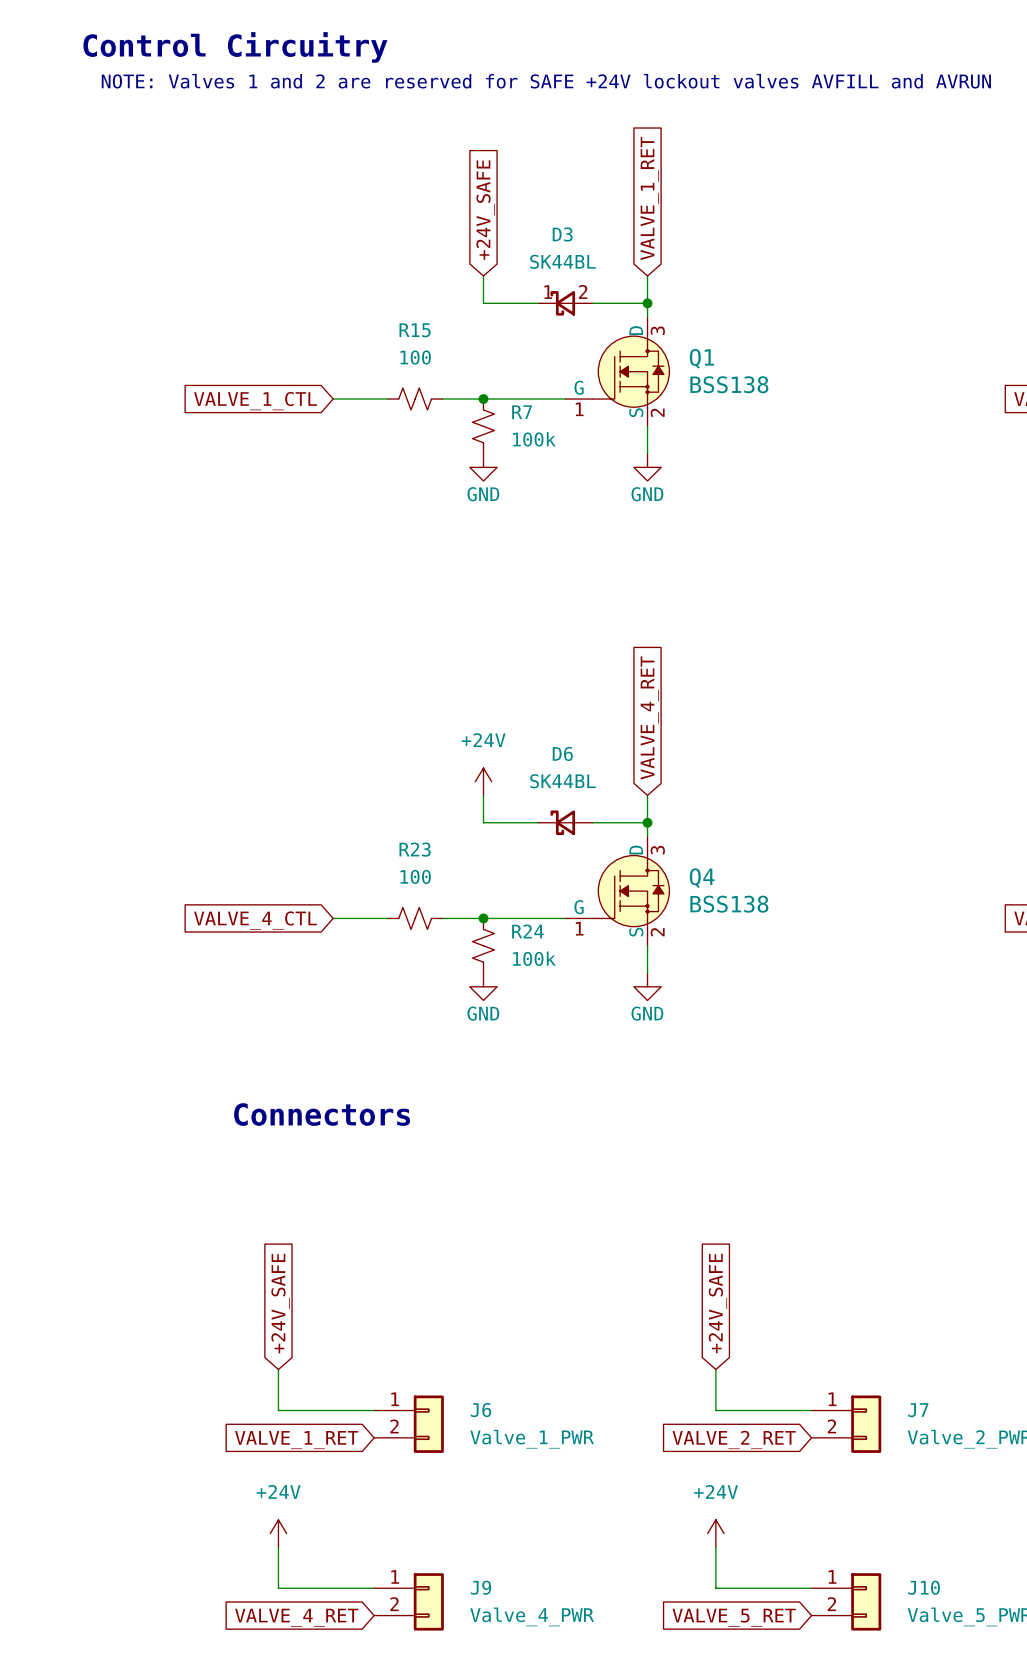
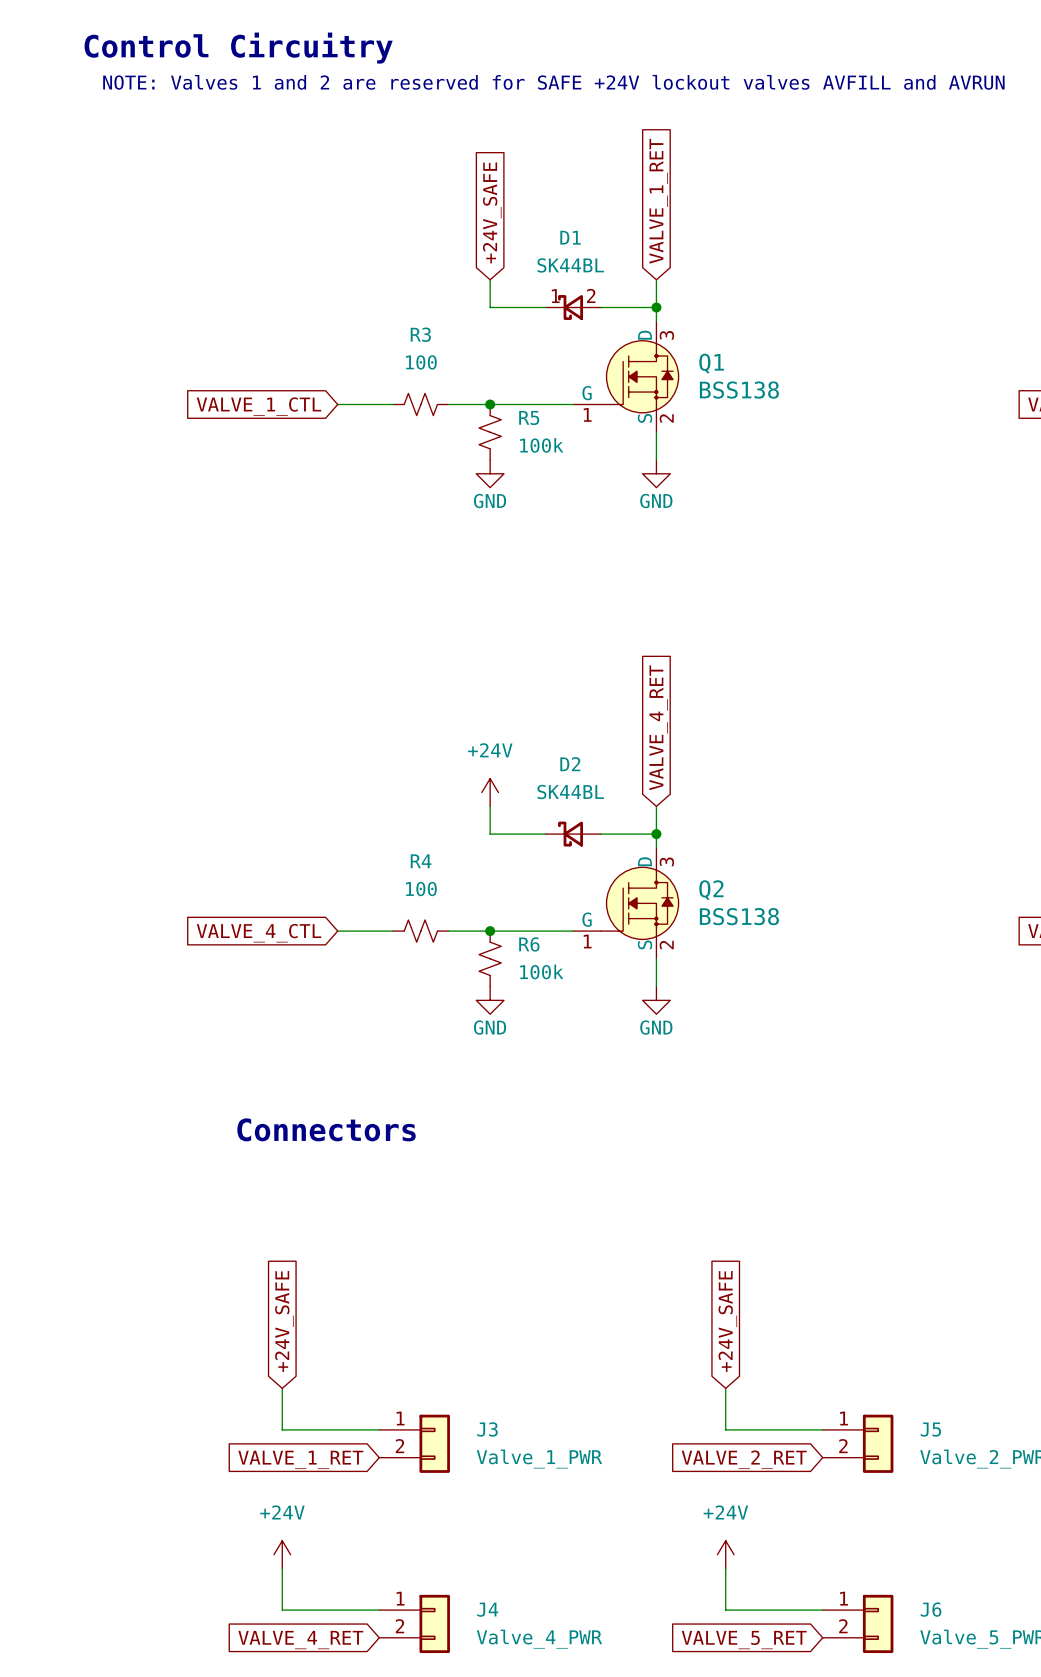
D3 name: D3 (562, 234) -> D1 (570, 237)
R15 name: R15 (415, 330) -> R3 (420, 334)
R7 name: R7 (522, 412) -> R5 (529, 417)
D6 name: D6 (562, 753) -> D2 (570, 764)
R23 name: R23 (415, 849) -> R4 (421, 861)
Q4 name: Q4 (702, 878) -> Q2 (711, 890)
R24 name: R24 (527, 931) -> R6 (529, 944)
J6 name: J6 (481, 1410) -> J3 (487, 1429)
J7 name: J7 (918, 1410) -> J5 (930, 1429)
J9 name: J9 (480, 1587) -> J4 (487, 1609)
J10 name: J10 (924, 1587) -> J6 (931, 1609)

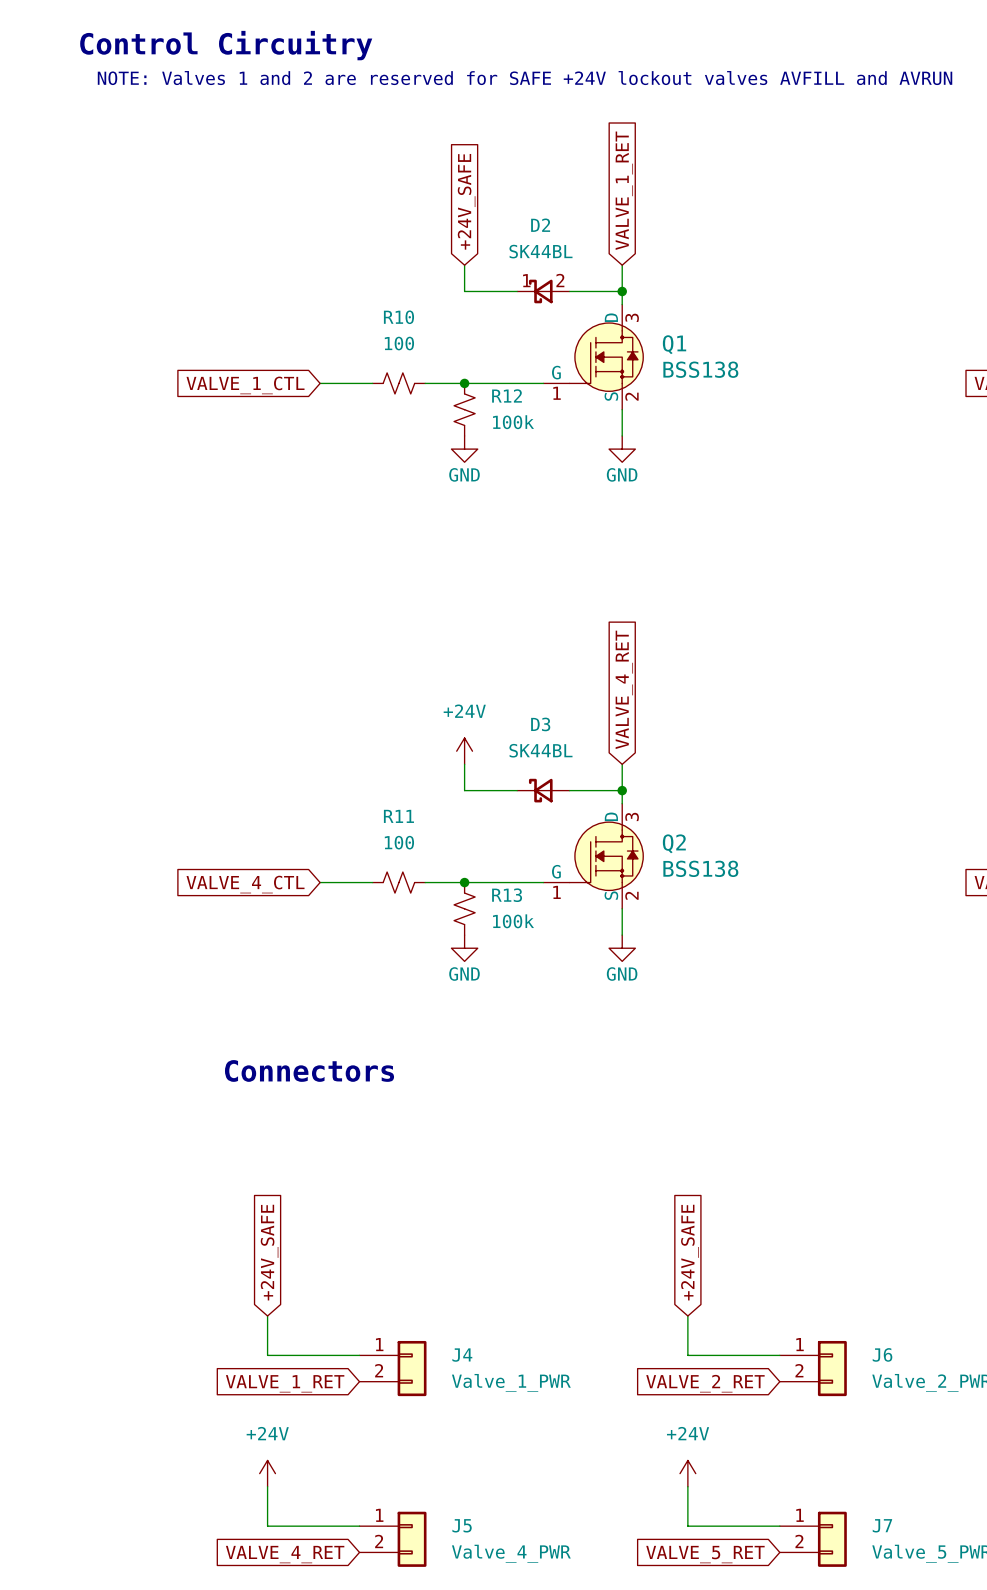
D1 name: D1 (570, 237) -> D2 (540, 225)
R3 name: R3 (420, 334) -> R10 (398, 317)
R5 name: R5 (529, 417) -> R12 (507, 395)
D2 name: D2 (570, 764) -> D3 (540, 724)
R4 name: R4 (421, 861) -> R11 (398, 816)
R6 name: R6 (529, 944) -> R13 (507, 895)
J3 name: J3 (487, 1429) -> J4 (462, 1355)
J5 name: J5 (930, 1429) -> J6 (882, 1354)
J4 name: J4 (487, 1609) -> J5 (462, 1525)
J6 name: J6 (931, 1609) -> J7 (882, 1525)

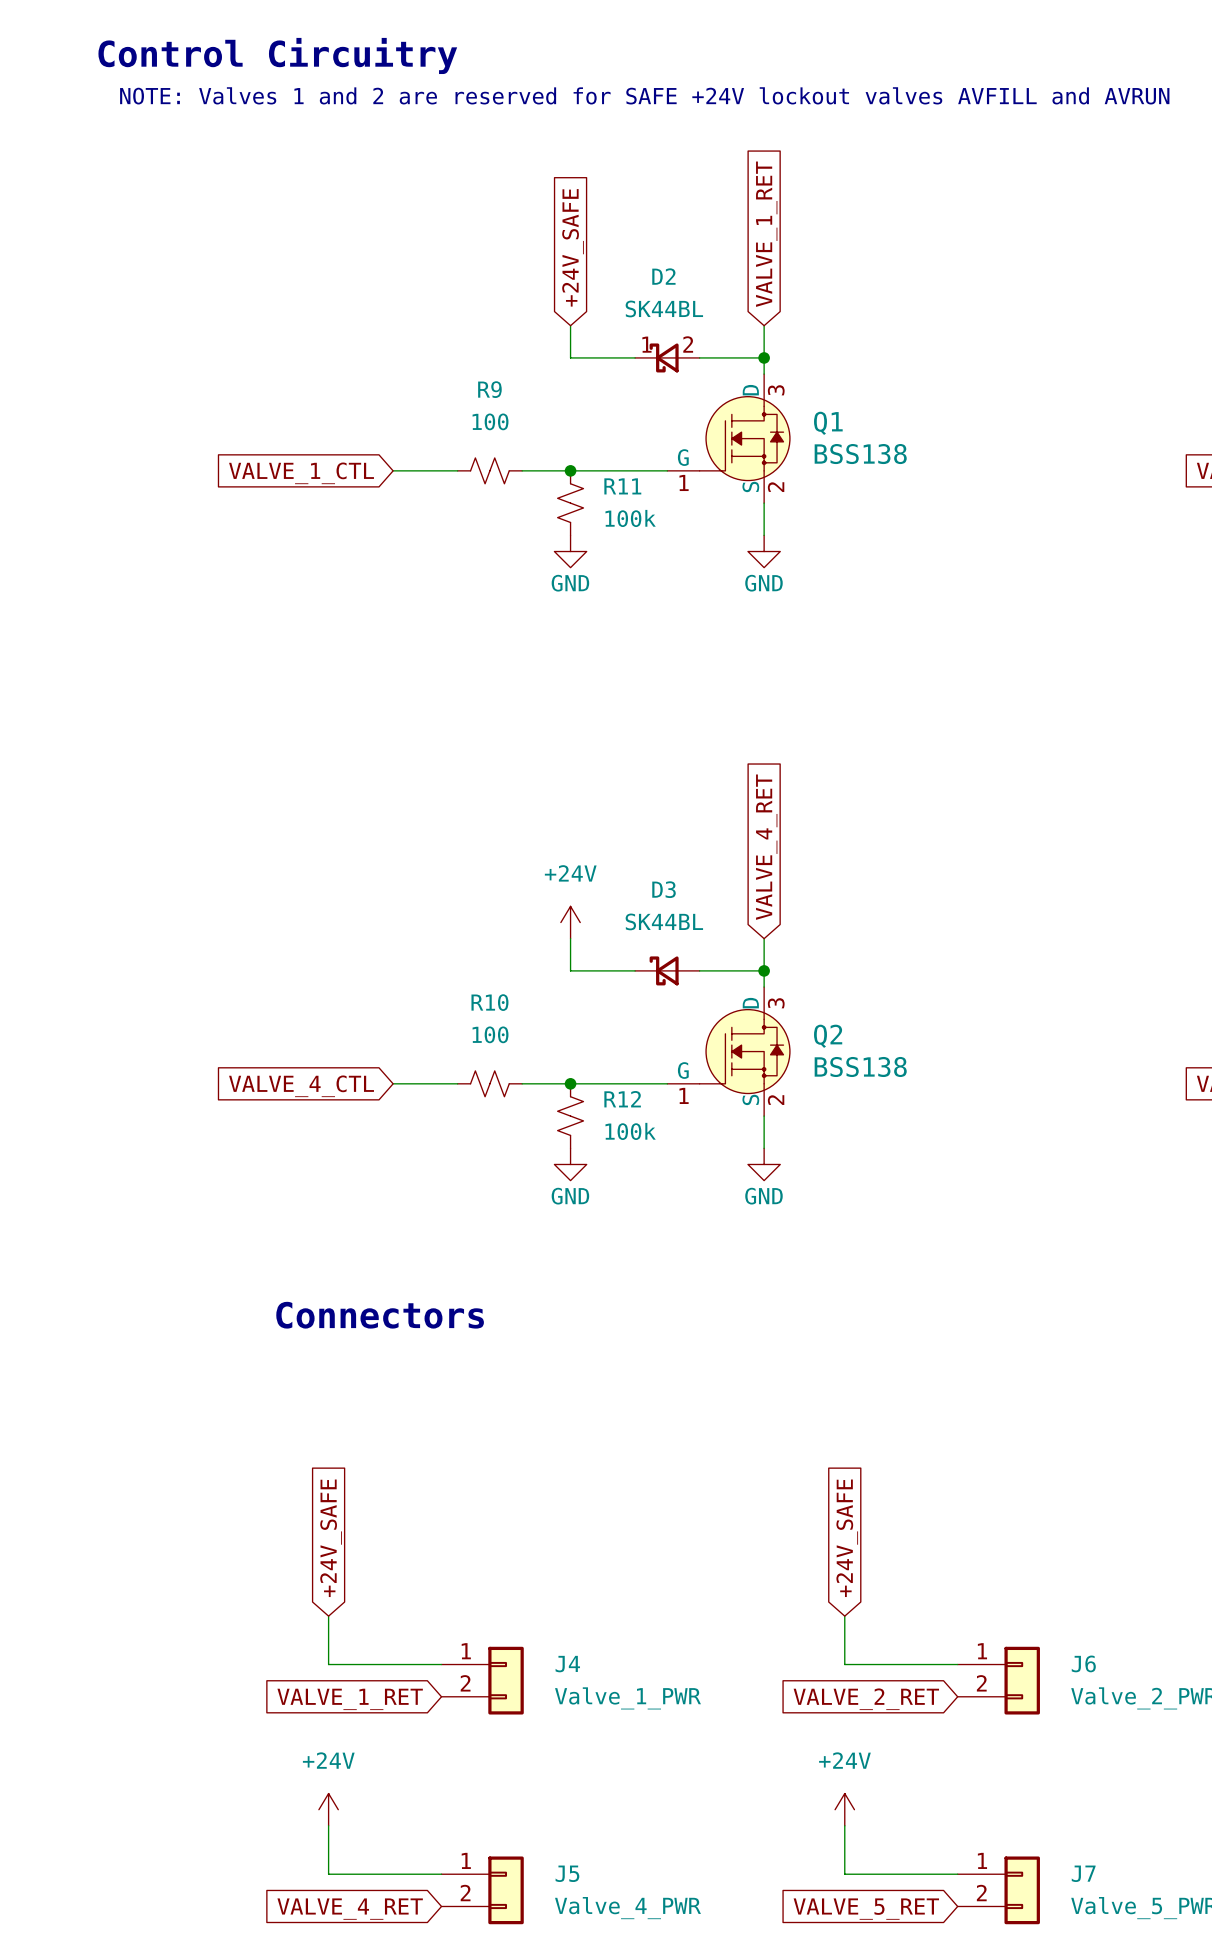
R10 name: R10 (398, 317) -> R9 (489, 389)
R12 name: R12 (507, 395) -> R11 (622, 486)
R11 name: R11 (398, 816) -> R10 (489, 1002)
R13 name: R13 (507, 895) -> R12 (622, 1099)

